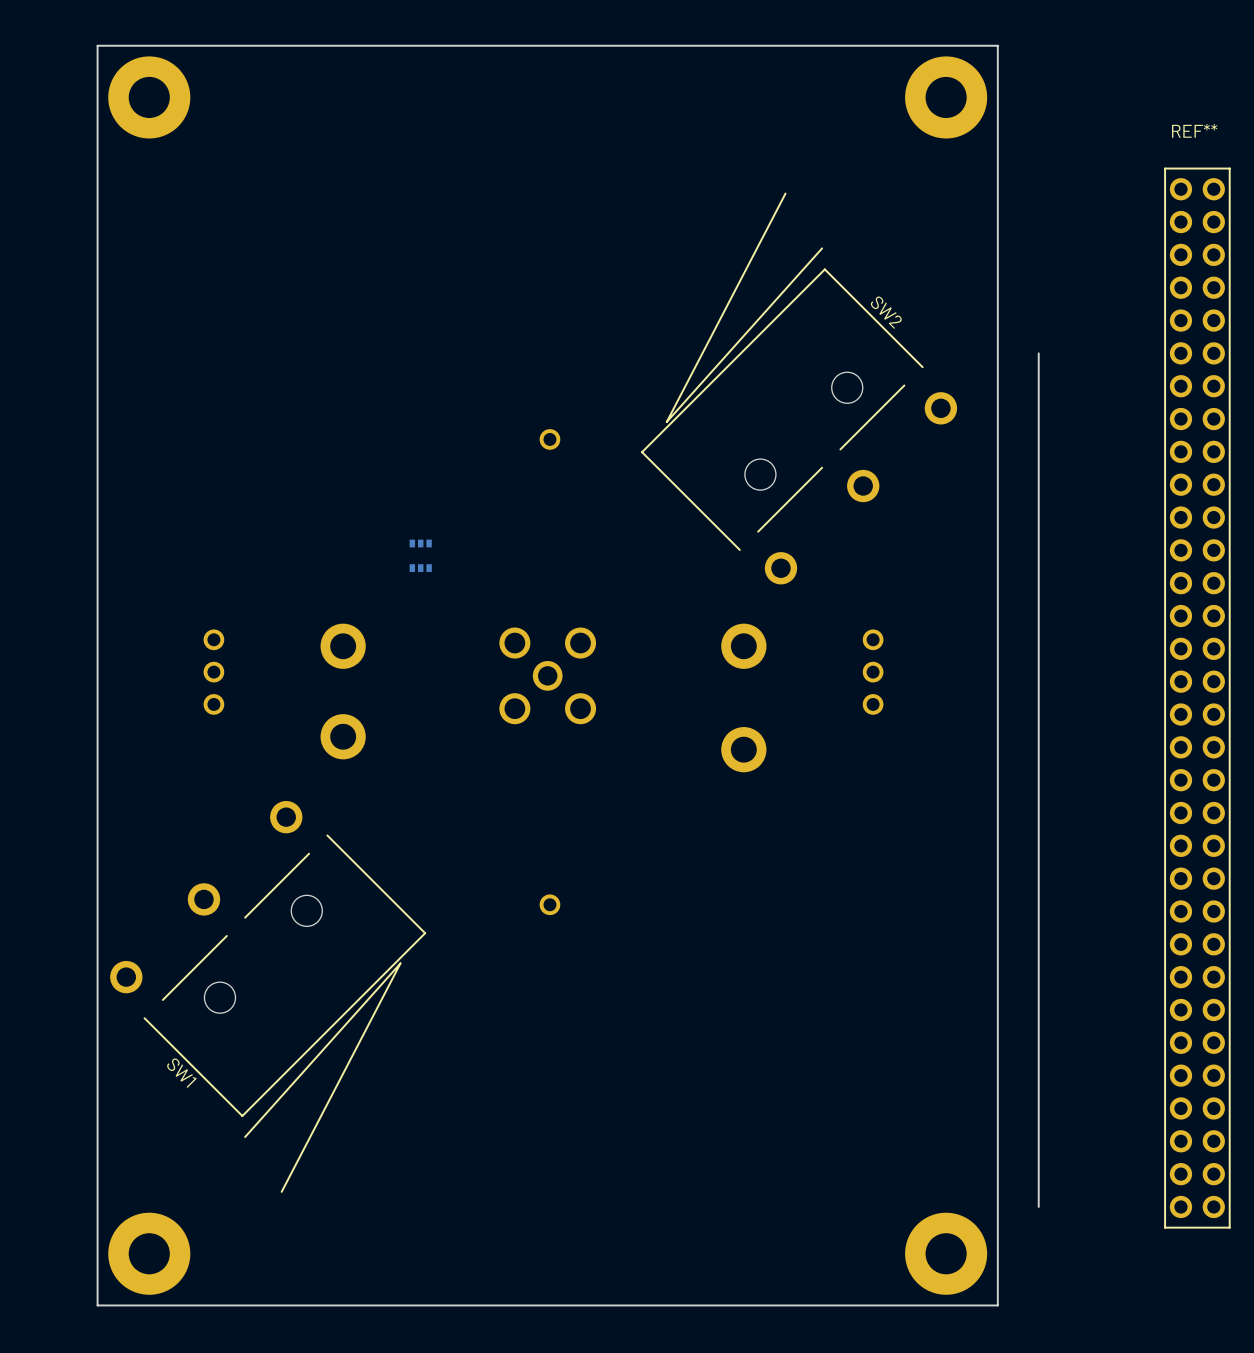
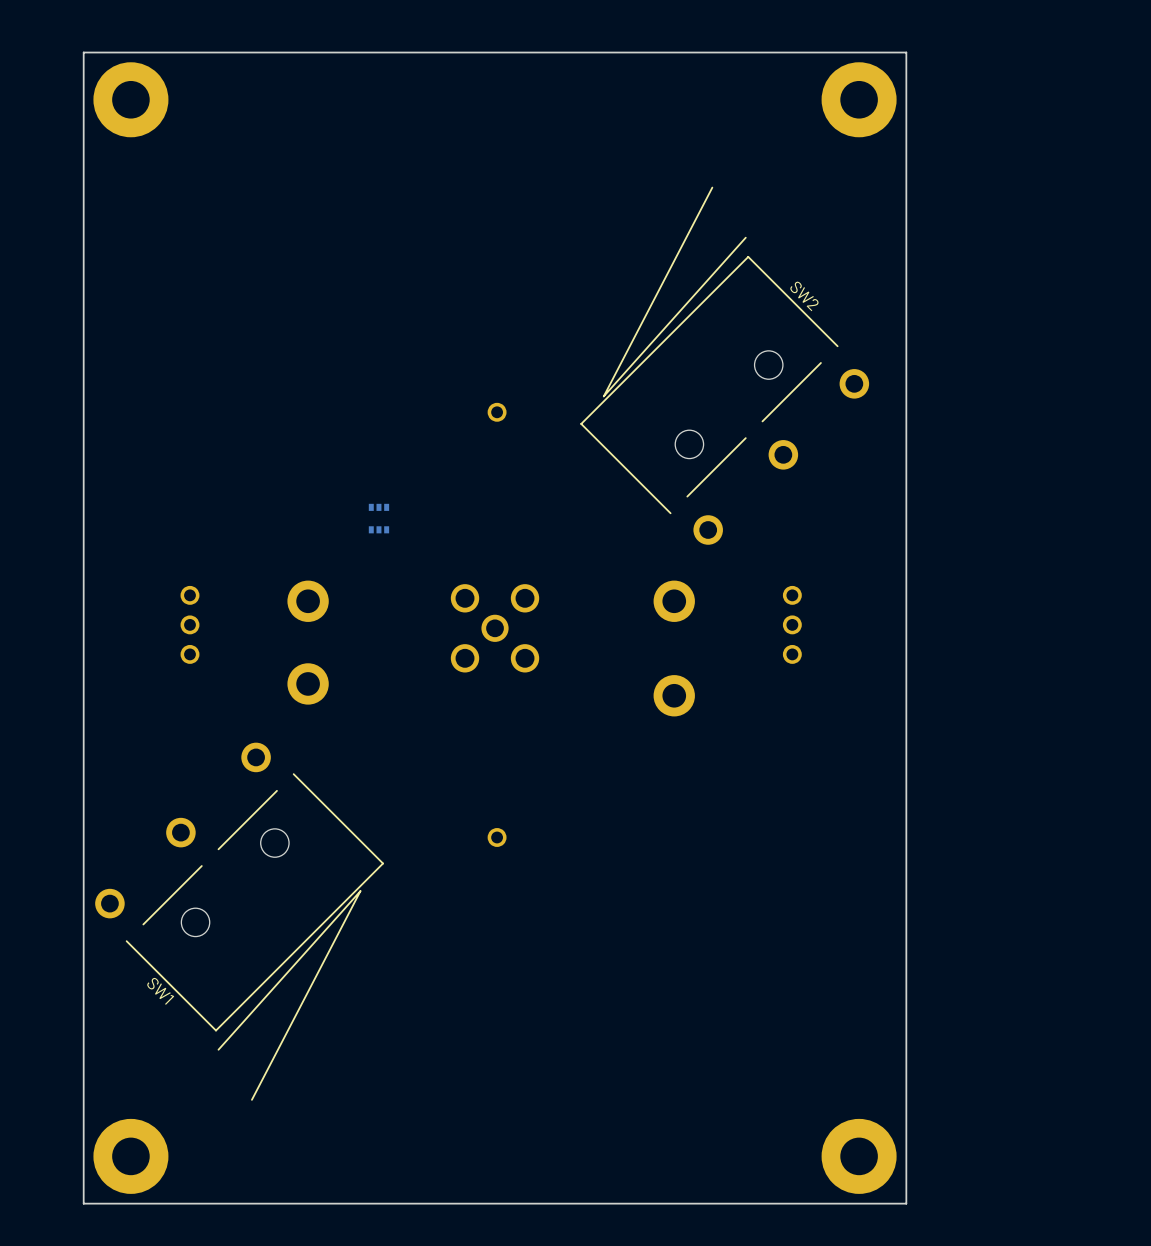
board edge: (1038, 353) (1038, 1206) -> none
REF**: (1197, 698) -> none

